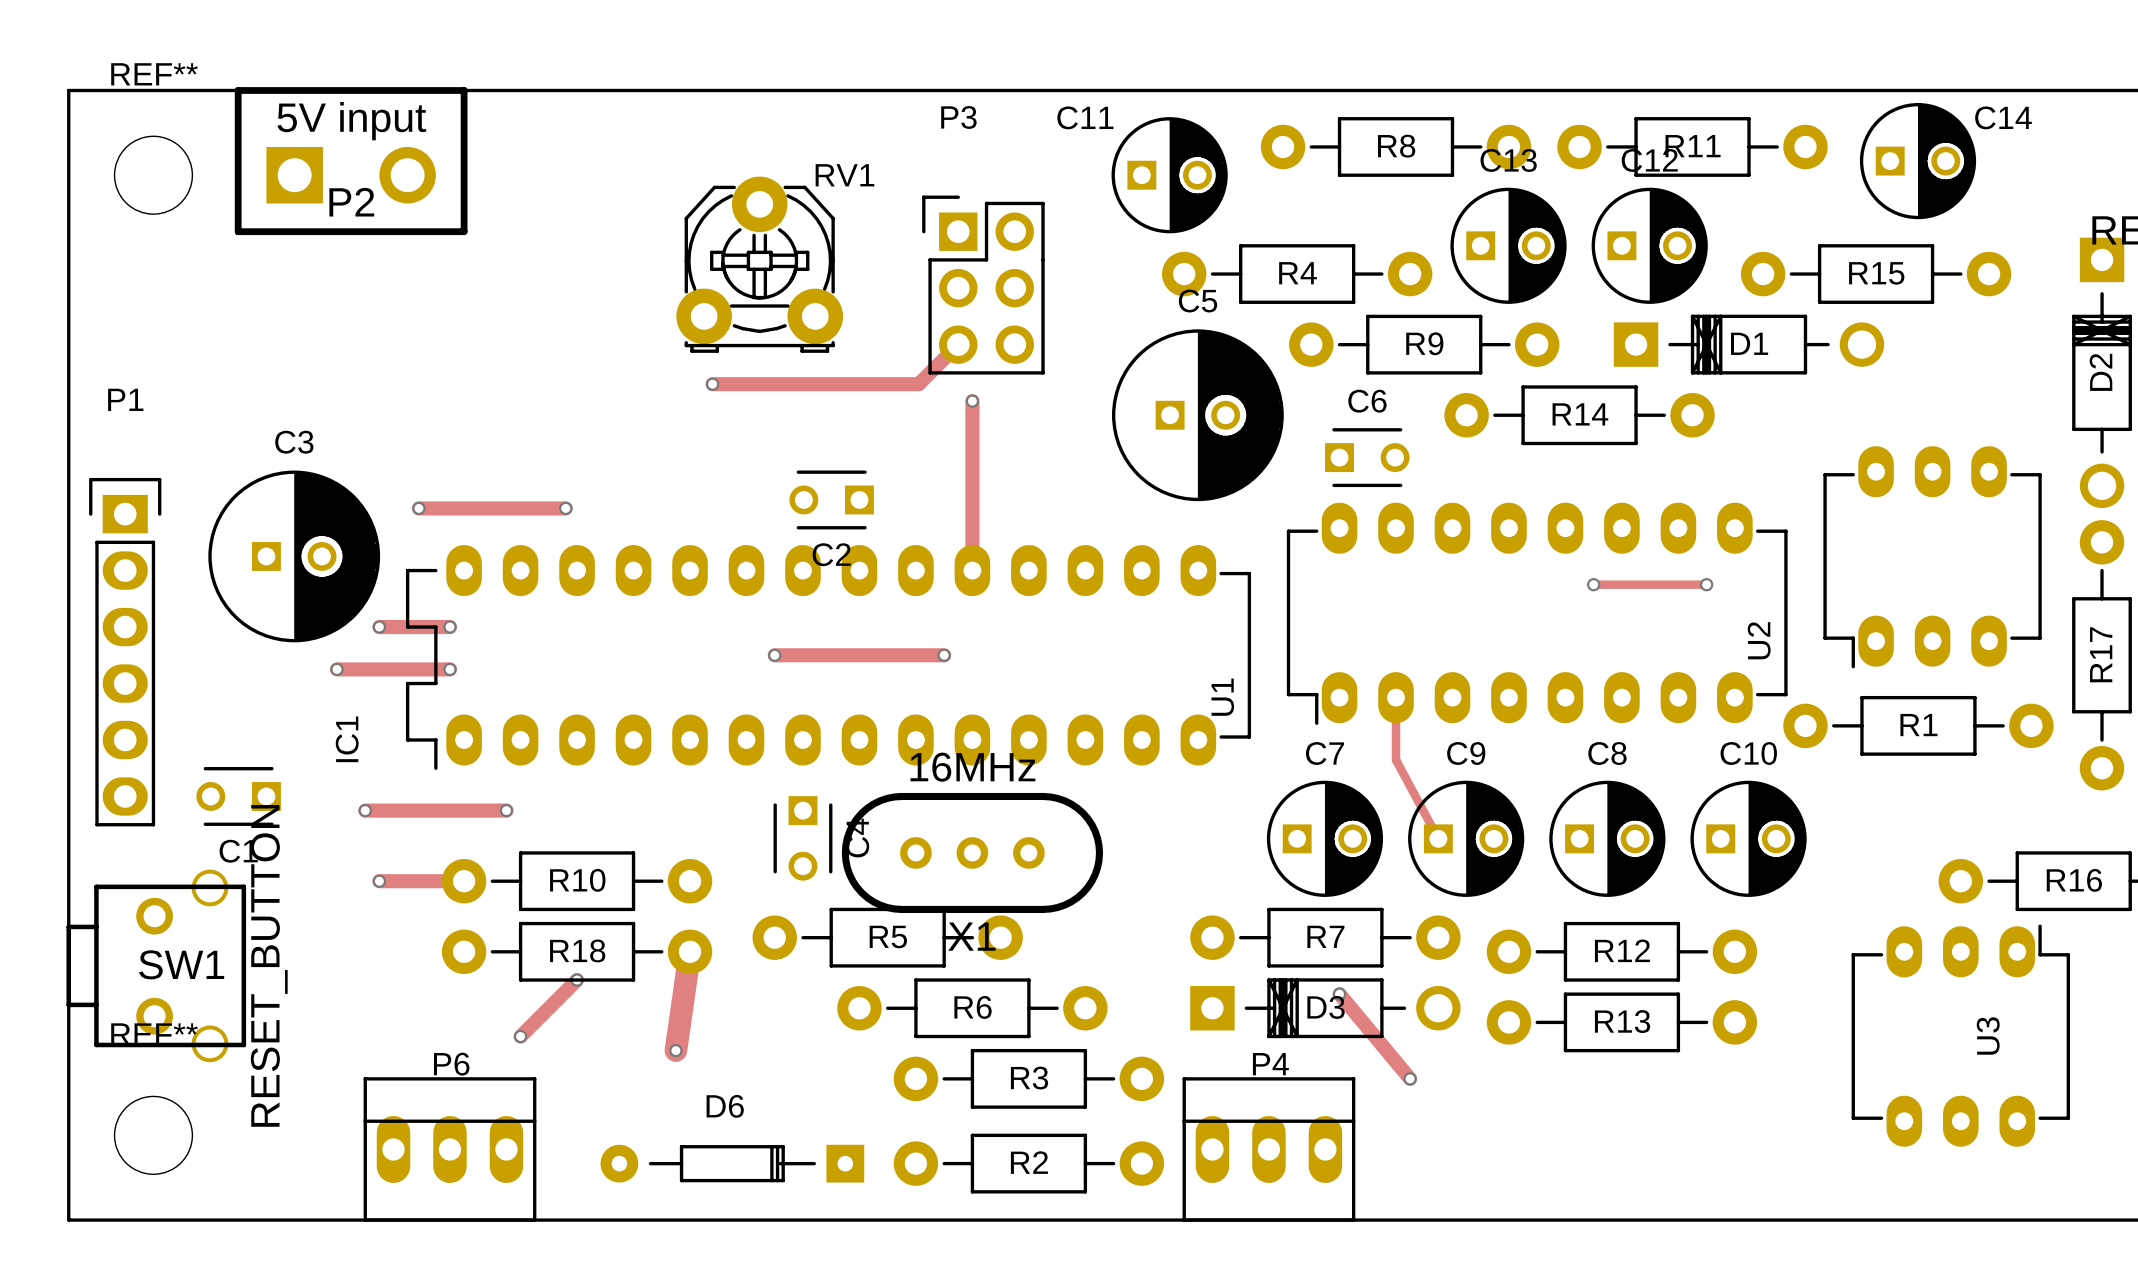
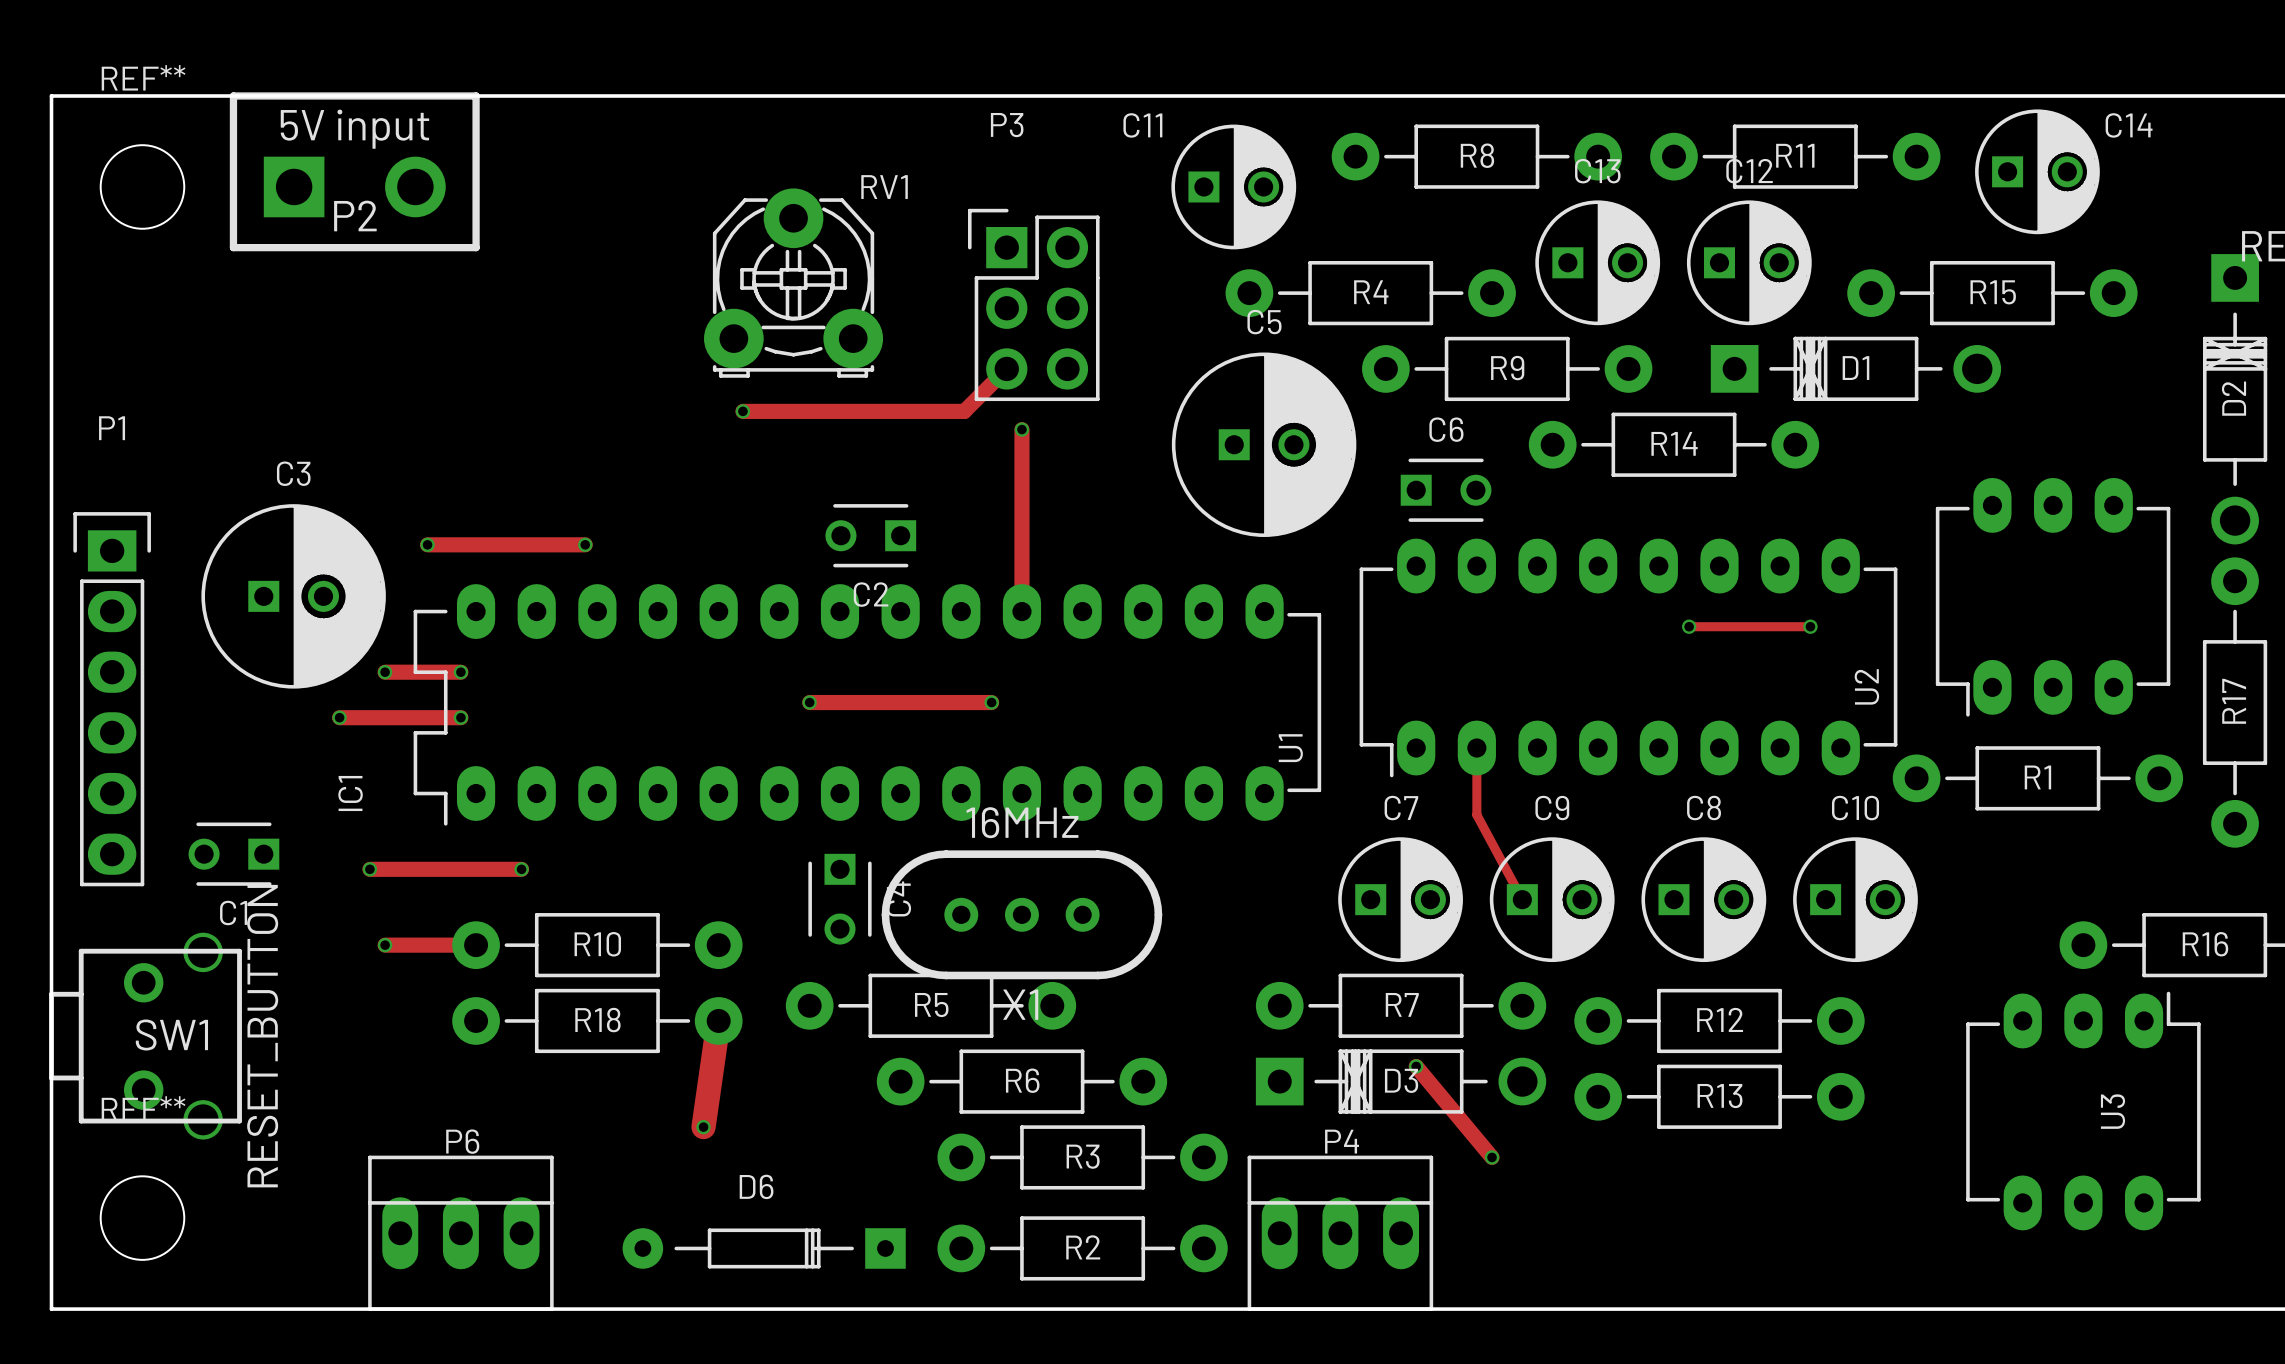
track: (577, 980) (520, 1036) -> none
via: (577, 980) -> none
via: (520, 1036) -> none

